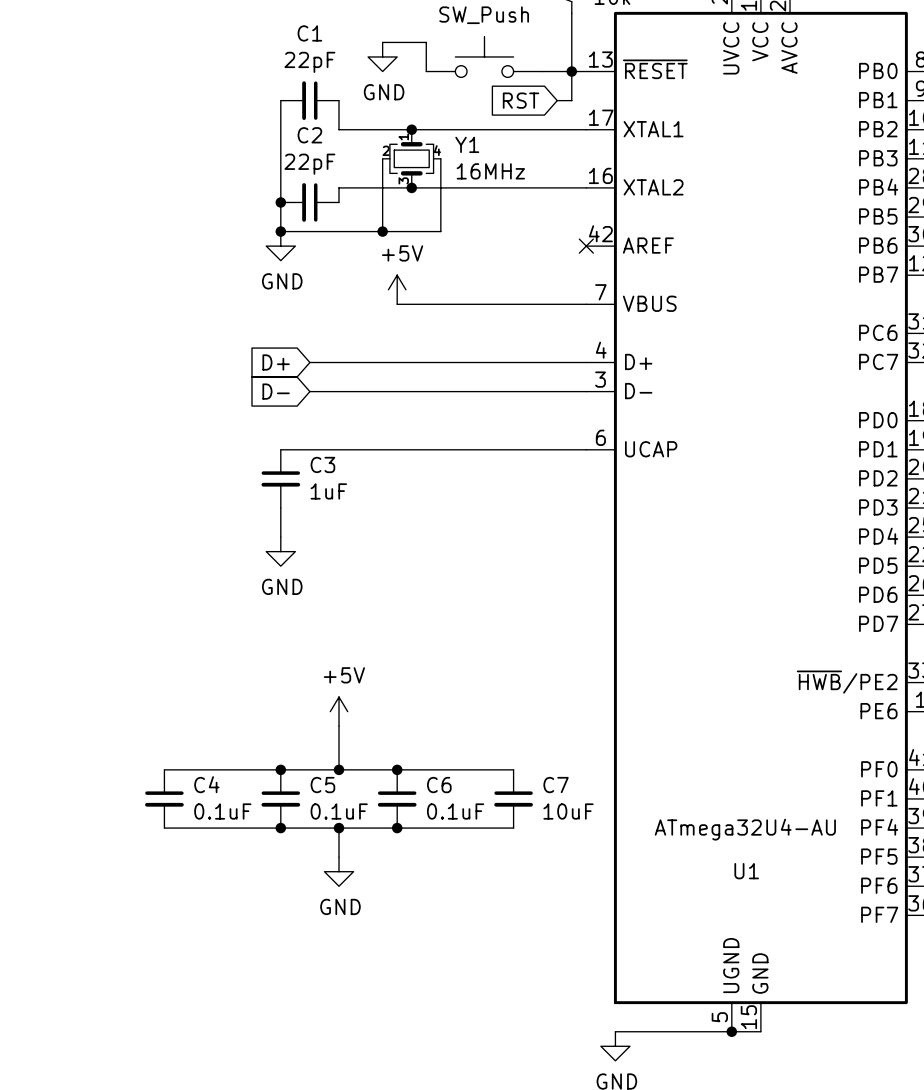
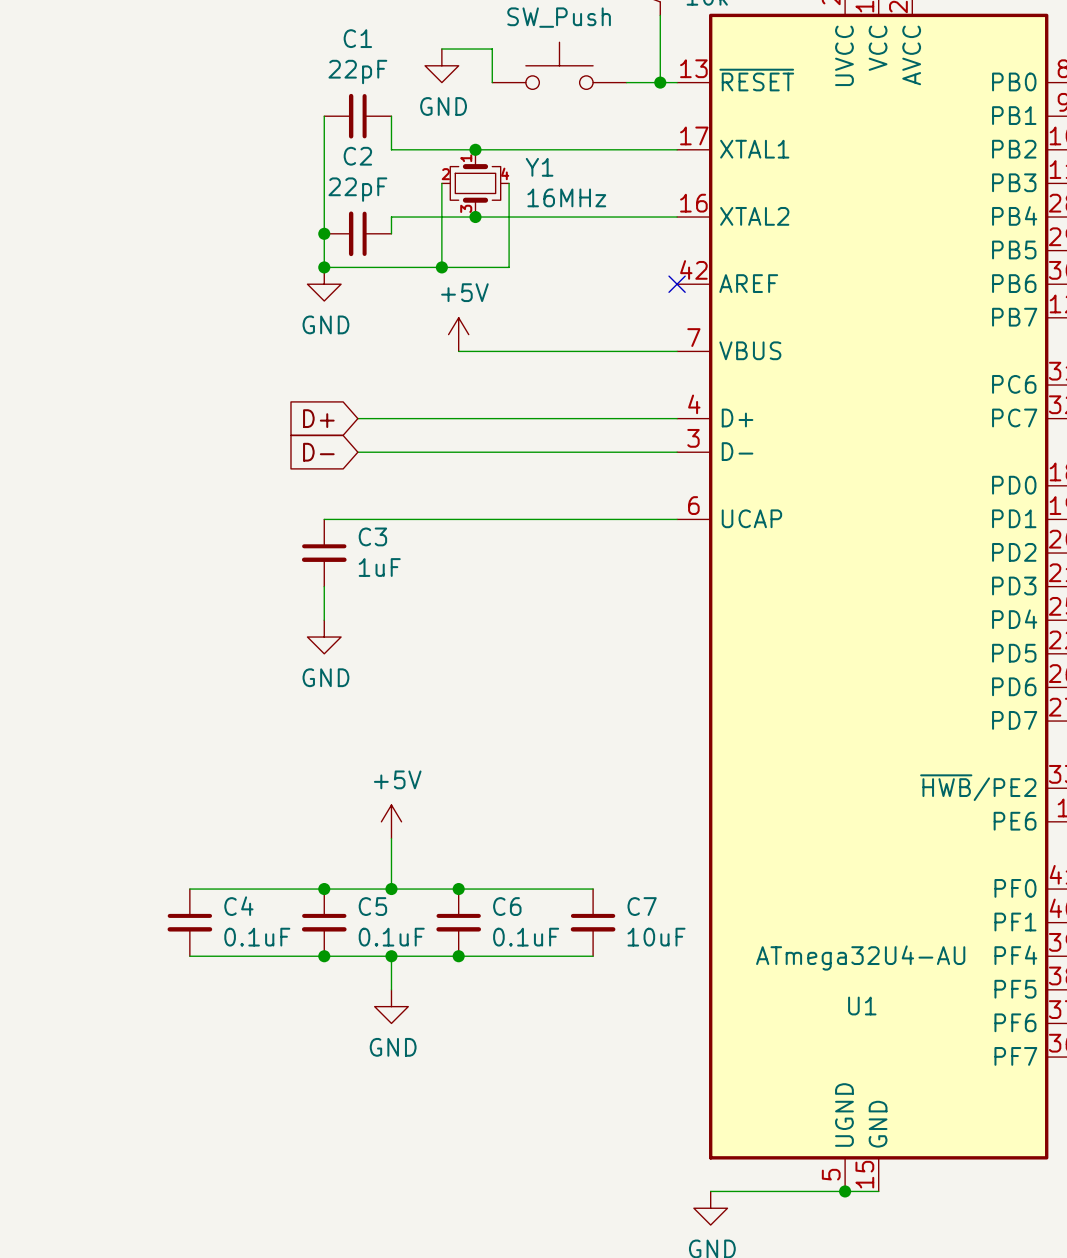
wire: (571, 71) (571, 100) (557, 100) -> none
global label: RST (521, 100) -> none

